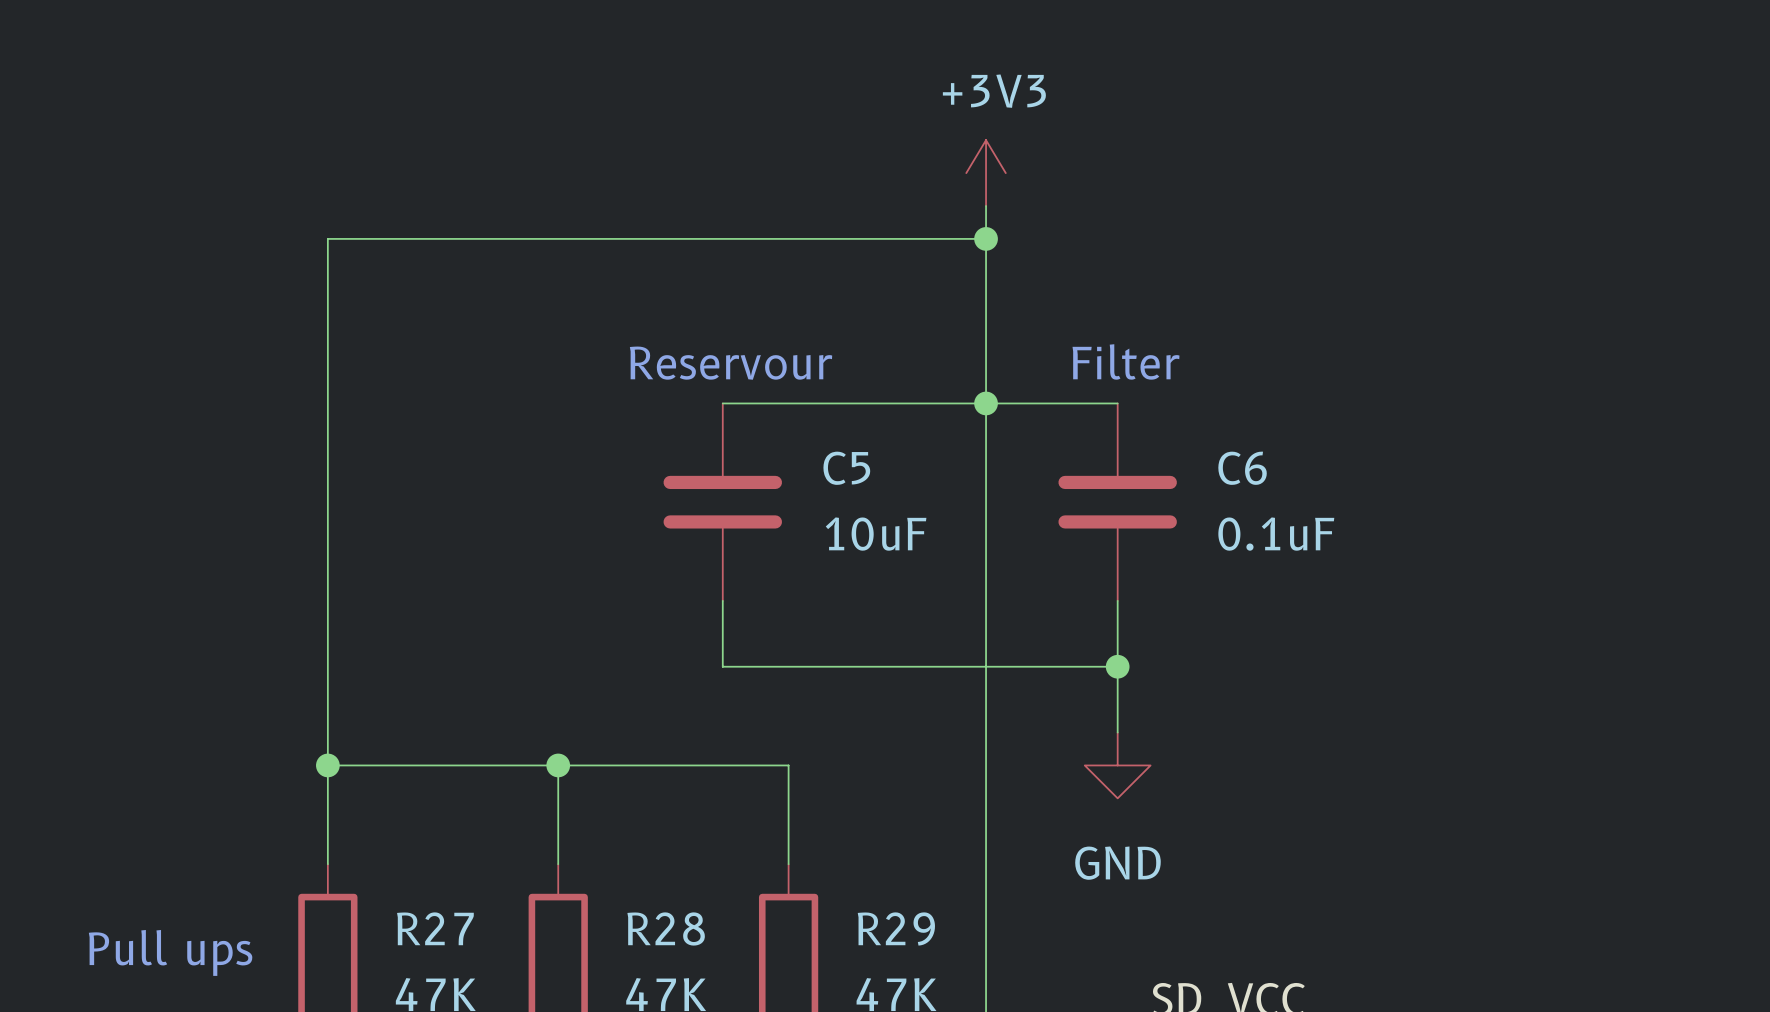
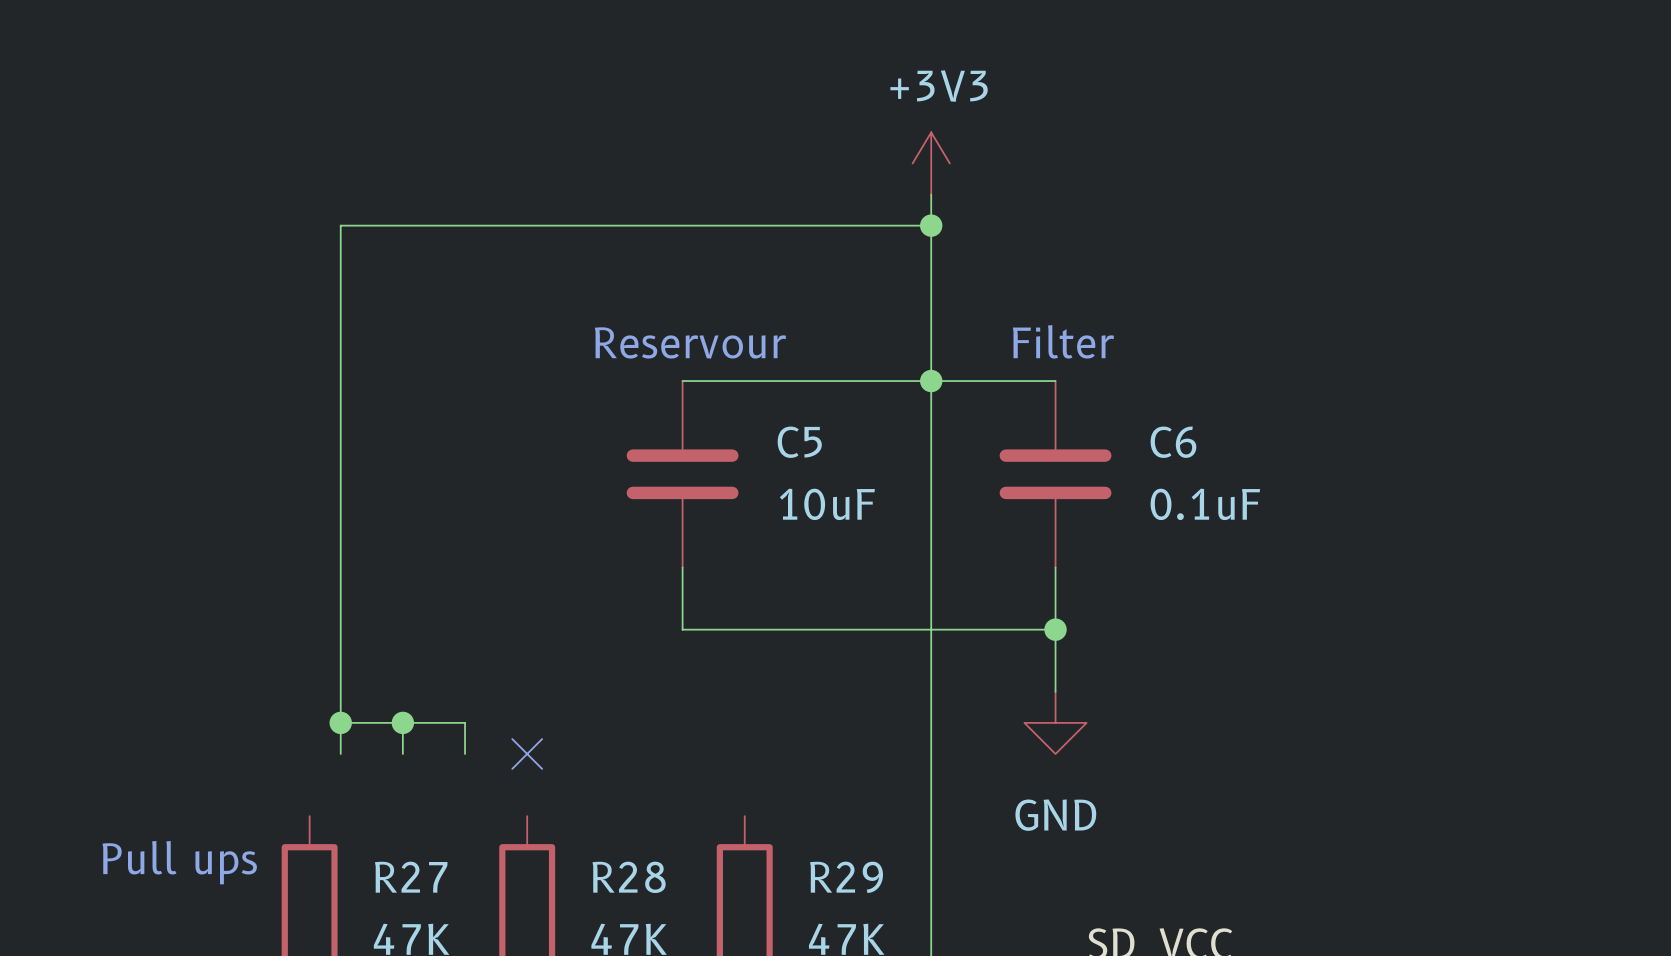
wire: (360, 238) (327, 238) (327, 864) -> (340, 225) (340, 753)
wire: (327, 765) (360, 765) -> none
junction position: (327, 765) -> (340, 722)
wire: none -> (402, 722) (402, 753)
junction: none -> (402, 722)
wire: (492, 765) (788, 765) (788, 864) -> (465, 722) (465, 753)
wire: (558, 765) (558, 864) -> none
junction: (558, 765) -> none
no-connect mark: none -> (527, 753)
text position: Pull ups (170, 952) -> Pull ups (179, 862)

